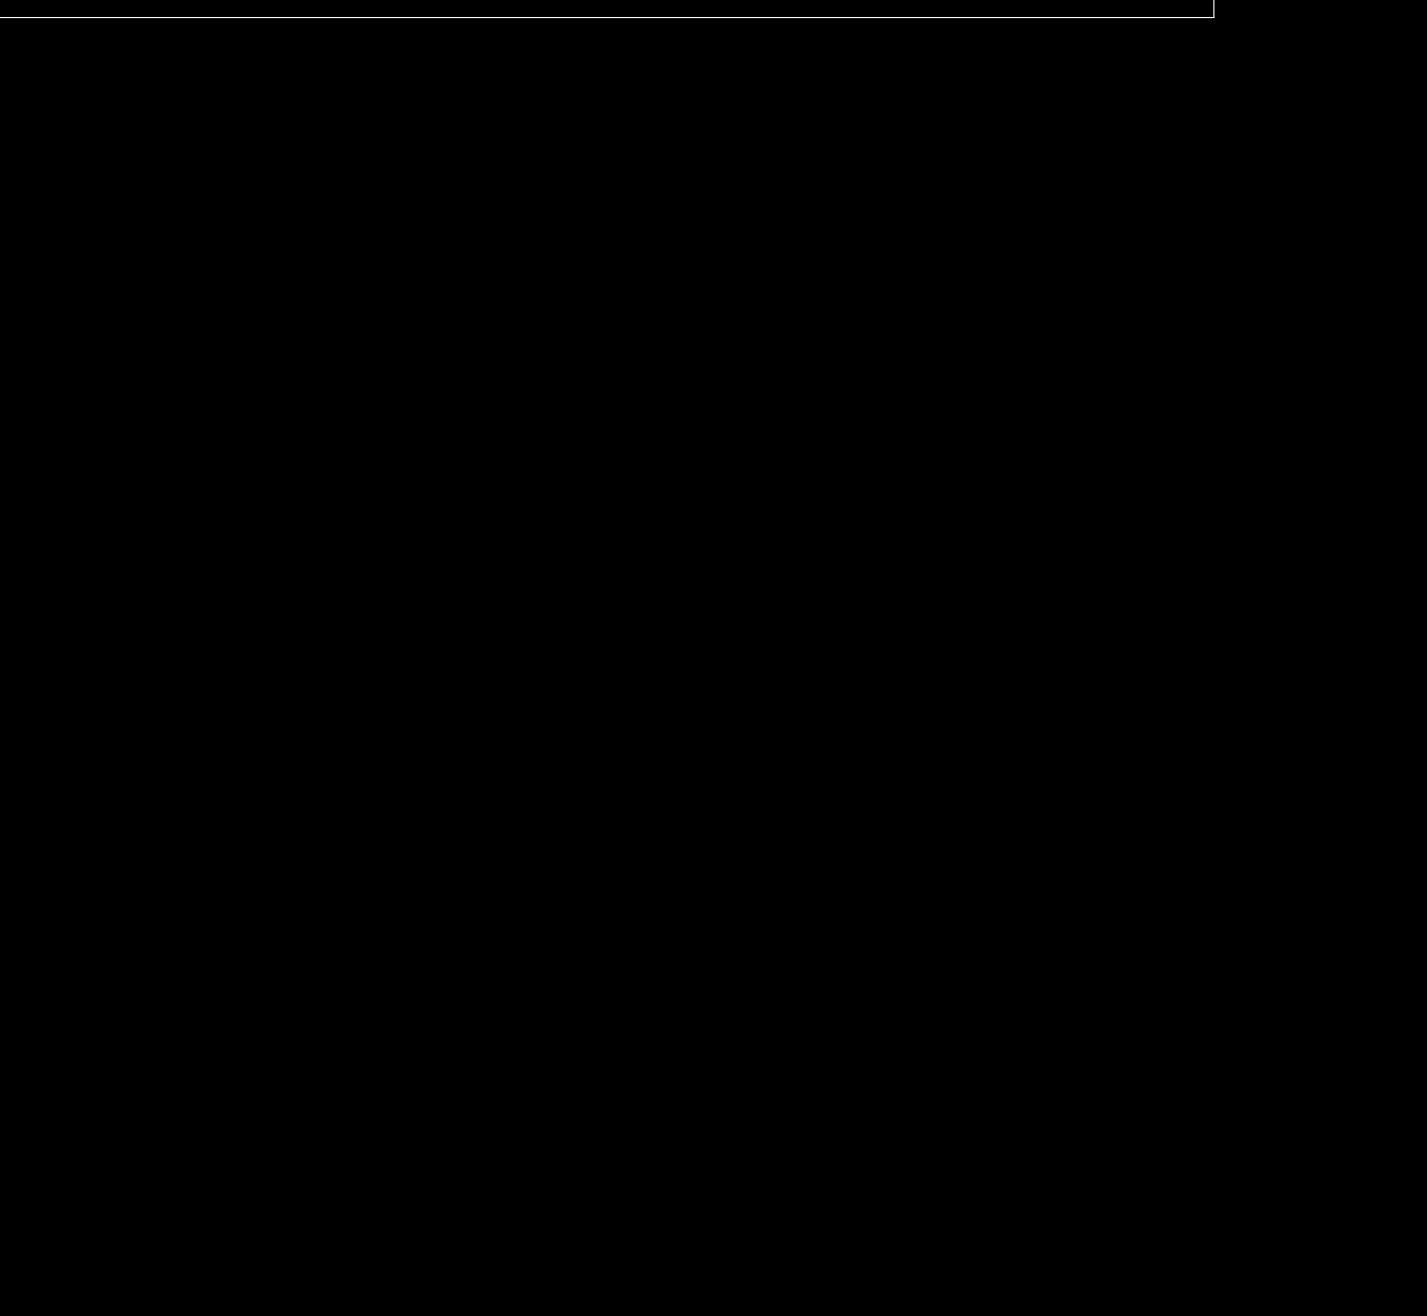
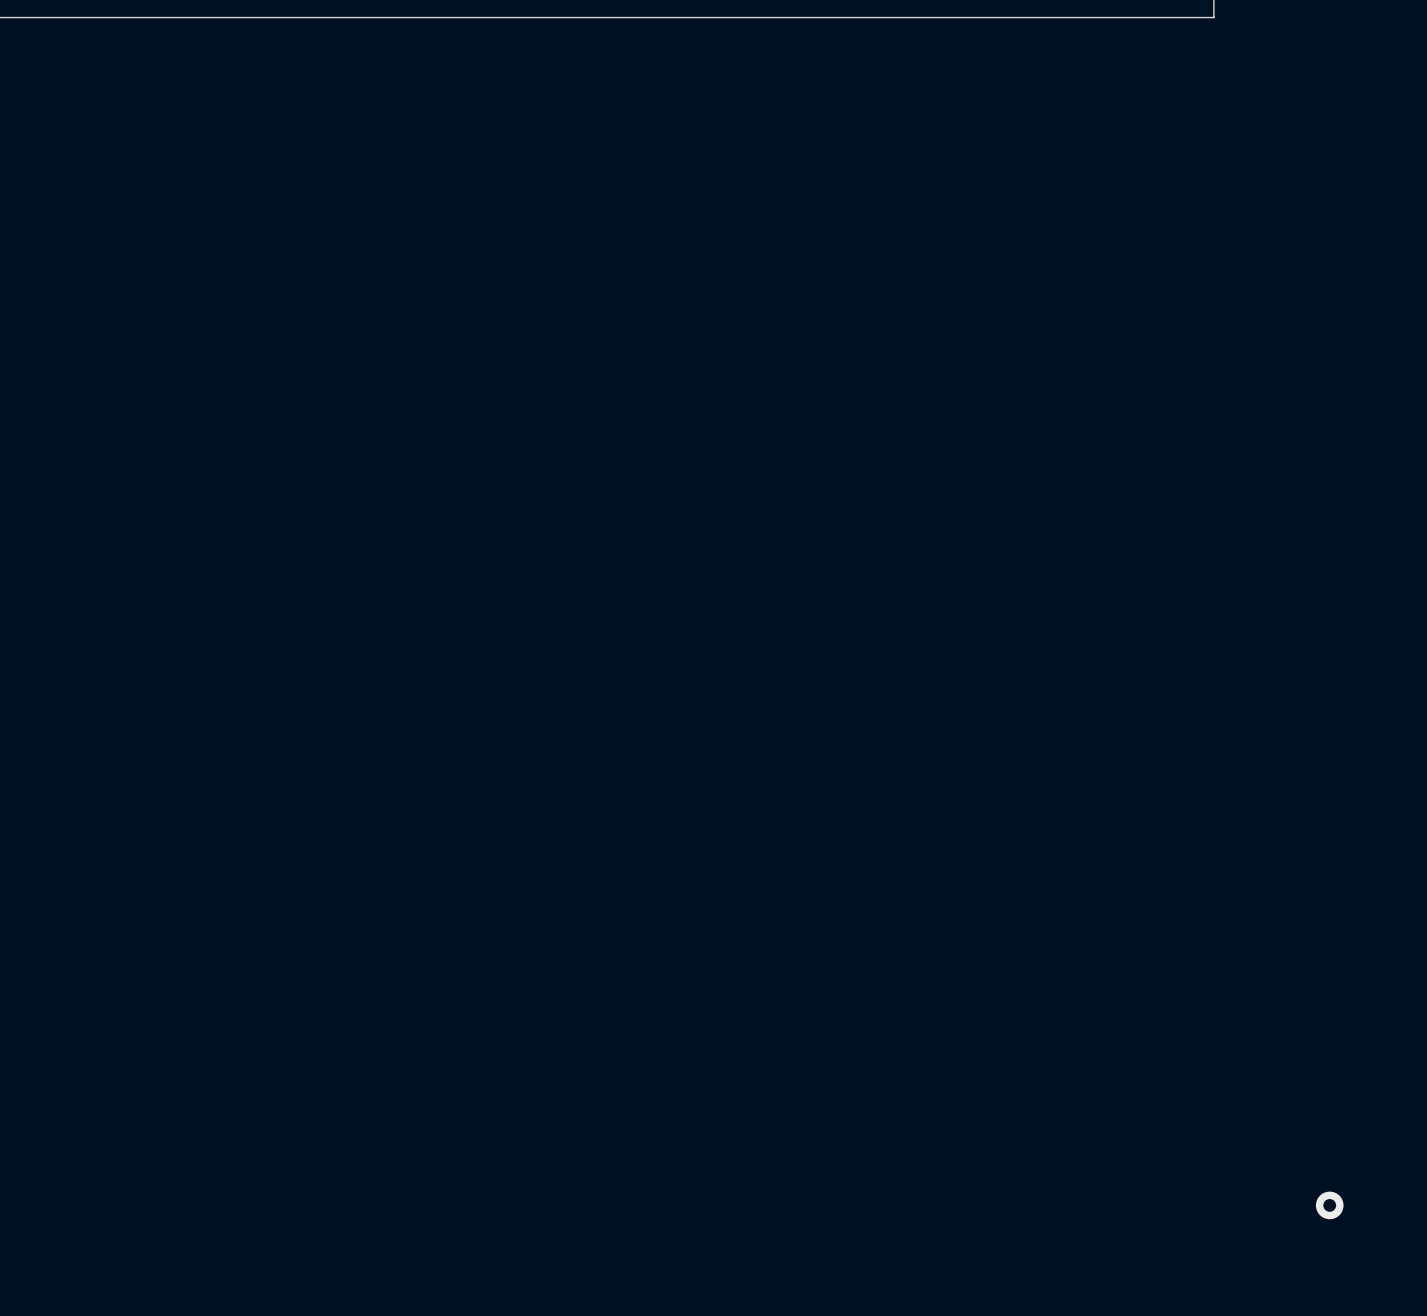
via: none -> (1329, 1205)

